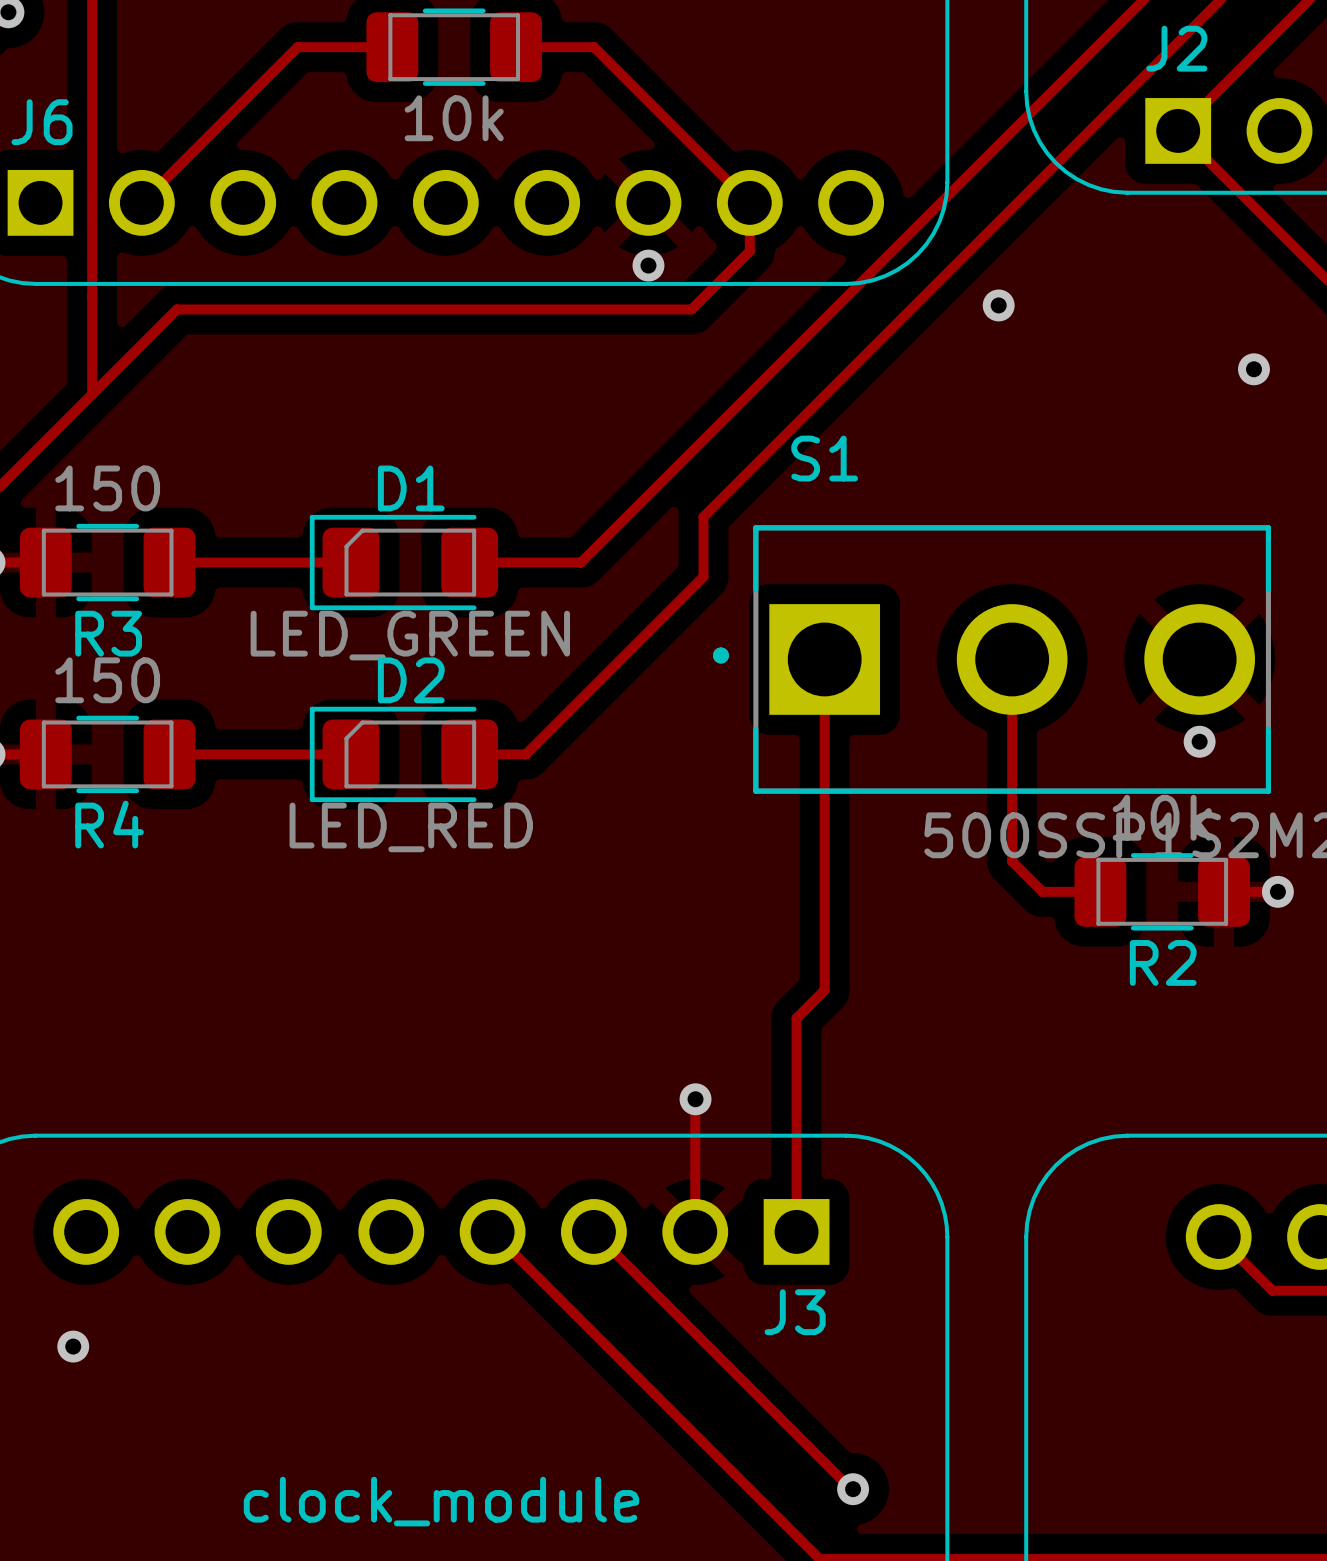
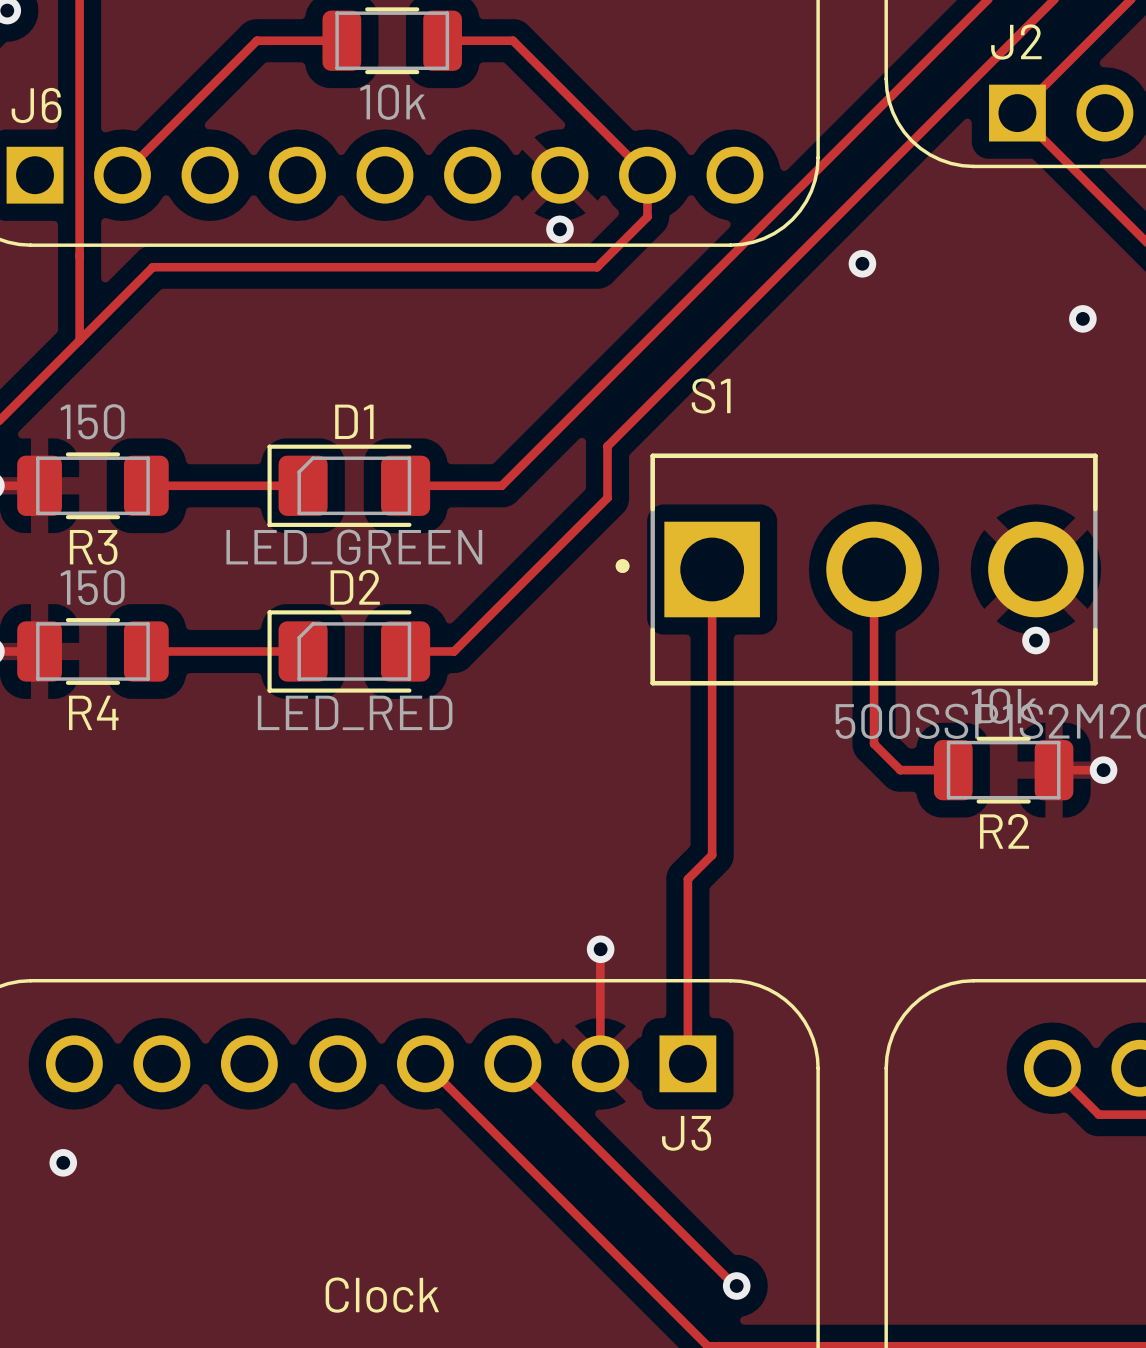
part footprint: [366, 8, 542, 86] -> [322, 7, 462, 75]
R2 footprint: [1074, 853, 1250, 931] -> [933, 736, 1074, 804]
J3 value: clock_module (441, 1501) -> Clock (382, 1295)

